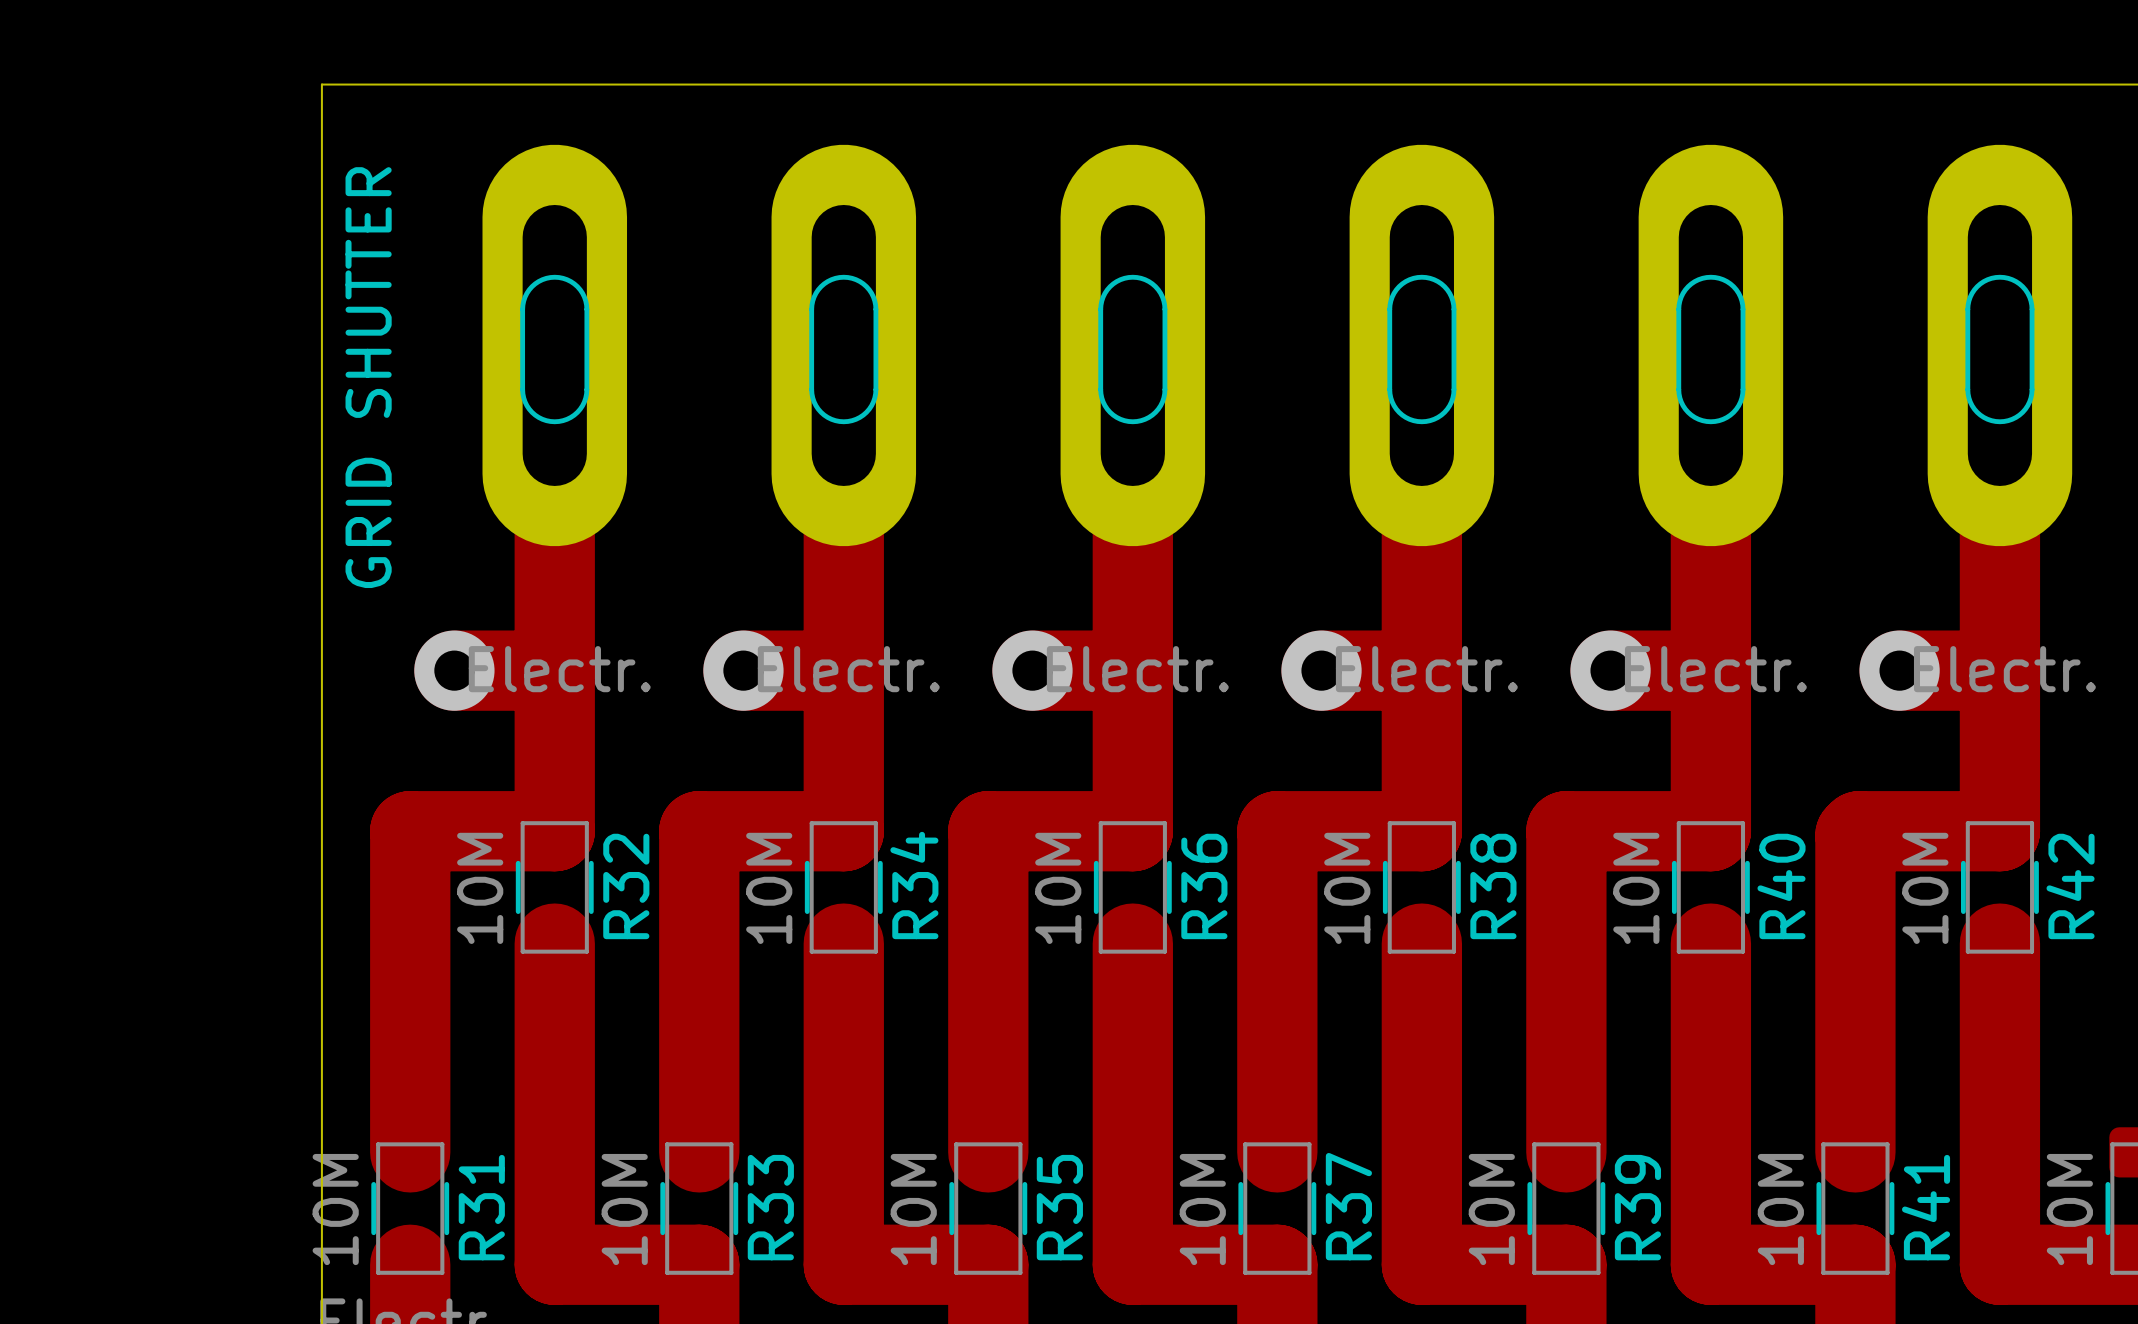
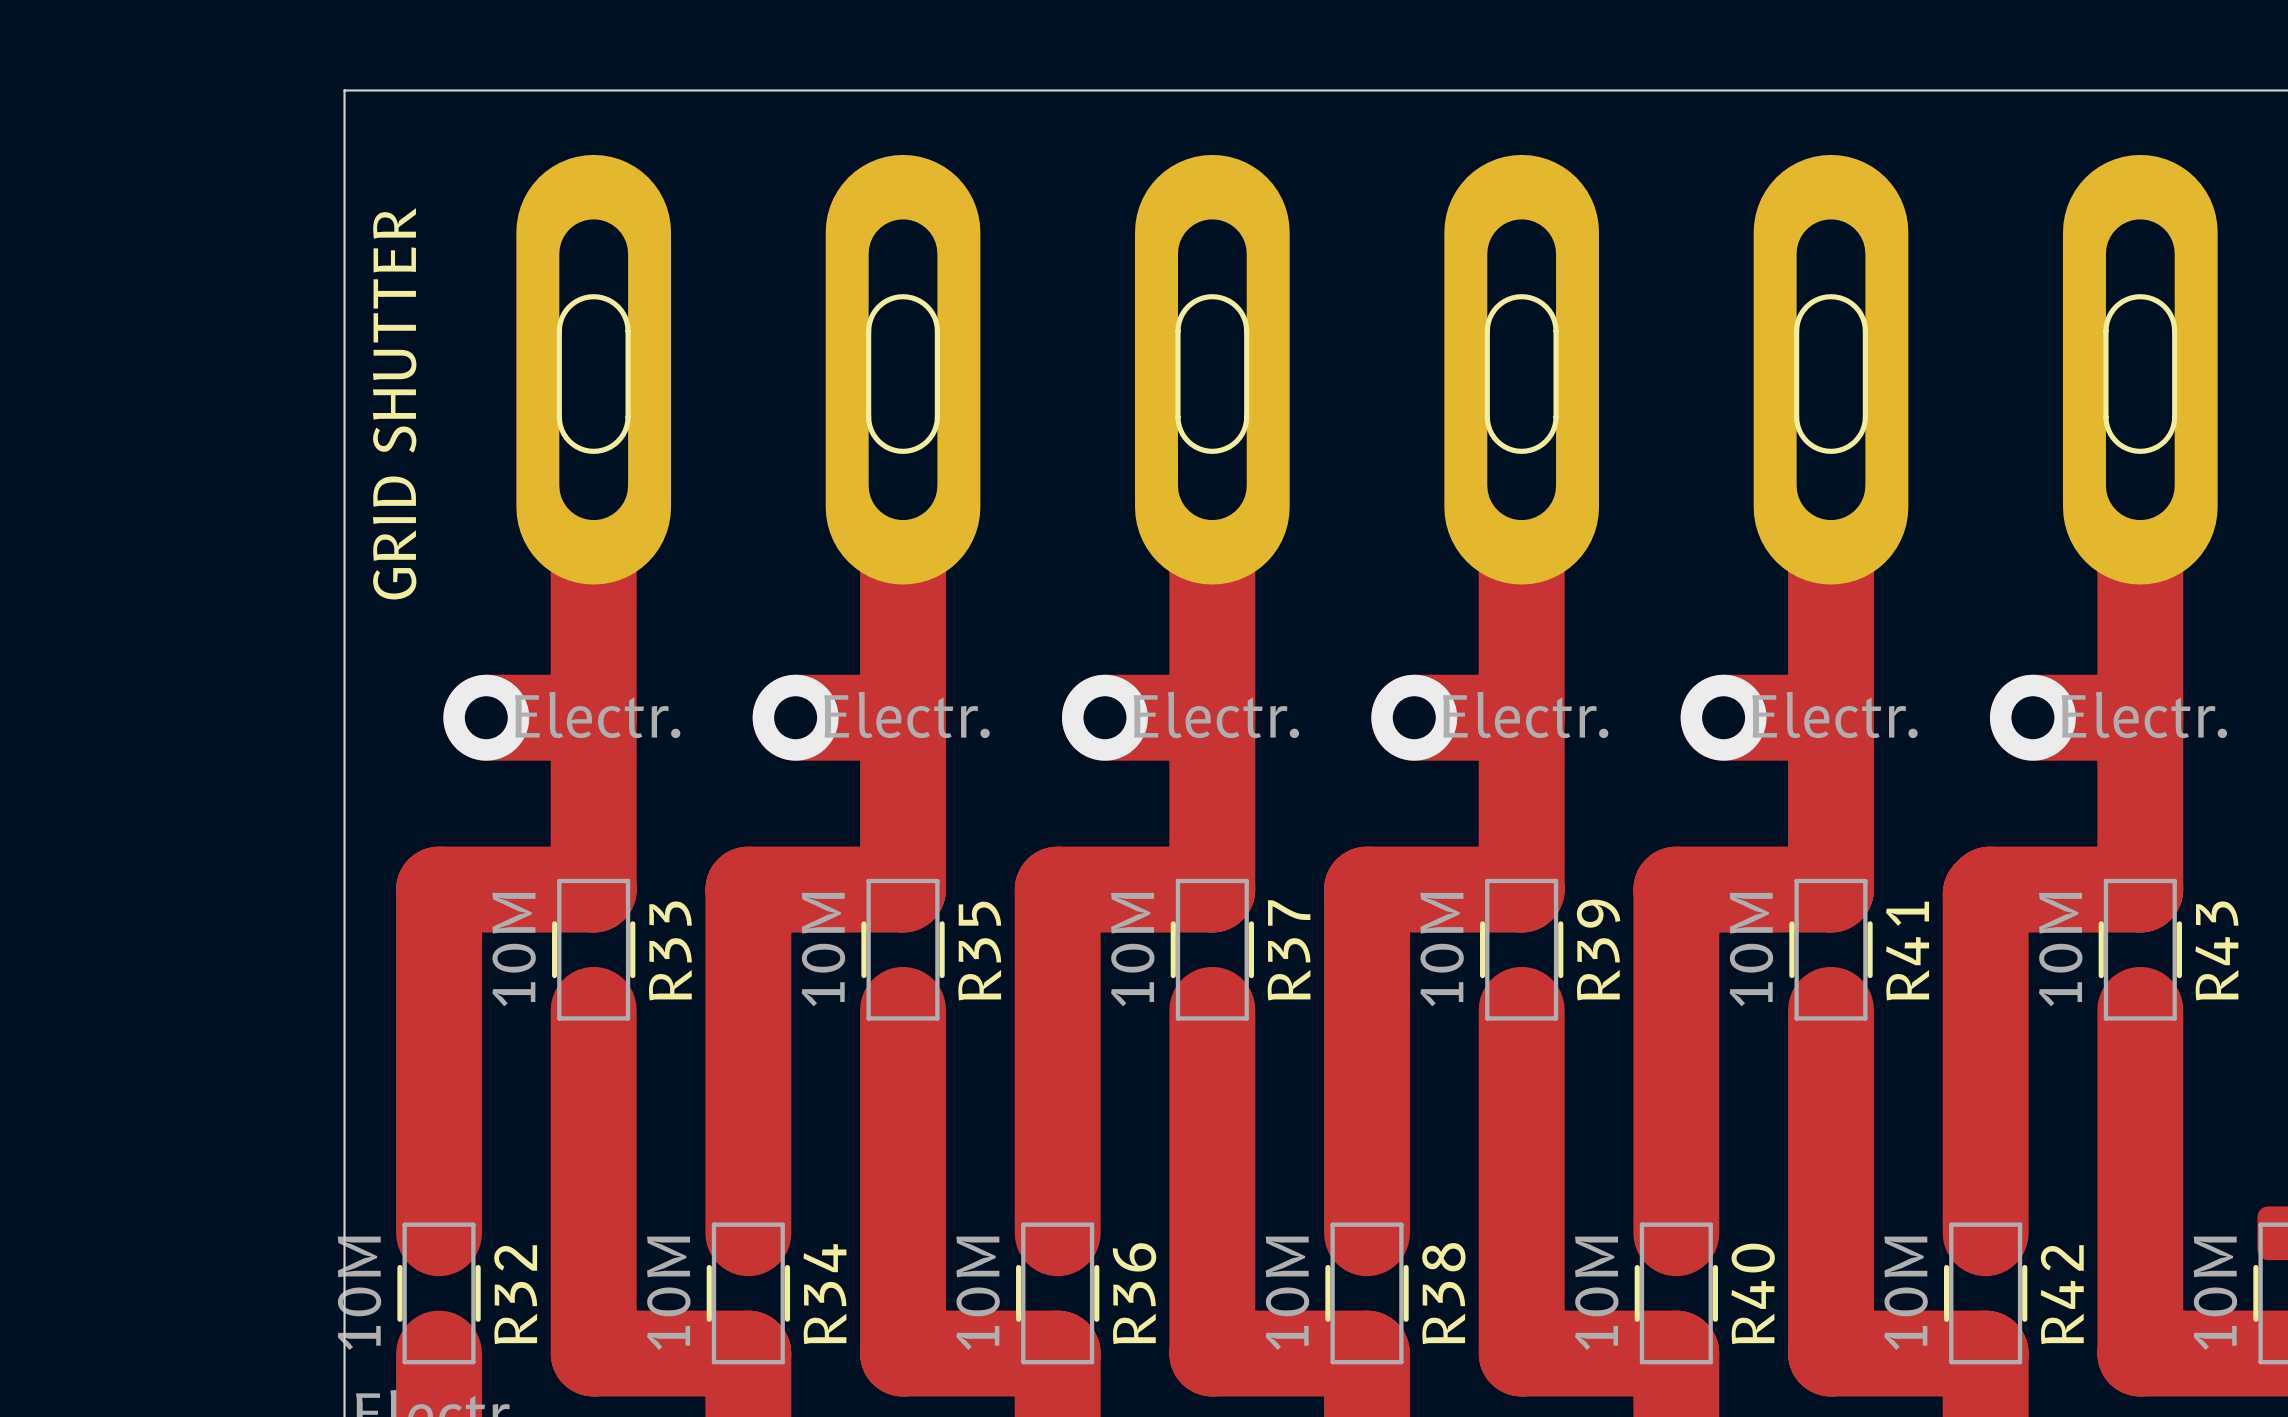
R34 name: R34 (914, 885) -> R35 (979, 951)
R32 name: R32 (626, 886) -> R33 (670, 950)
R36 name: R36 (1204, 886) -> R37 (1289, 950)
R38 name: R38 (1493, 886) -> R39 (1598, 950)
R40 name: R40 (1781, 886) -> R41 (1907, 951)
R42 name: R42 (2070, 886) -> R43 (2216, 950)
R37 name: R37 (1348, 1206) -> R38 (1443, 1293)
R31 name: R31 (481, 1207) -> R32 (515, 1294)
R33 name: R33 (770, 1207) -> R34 (824, 1294)
R35 name: R35 (1059, 1207) -> R36 (1134, 1293)
R39 name: R39 (1637, 1207) -> R40 (1753, 1293)
R41 name: R41 (1926, 1207) -> R42 (2062, 1294)

